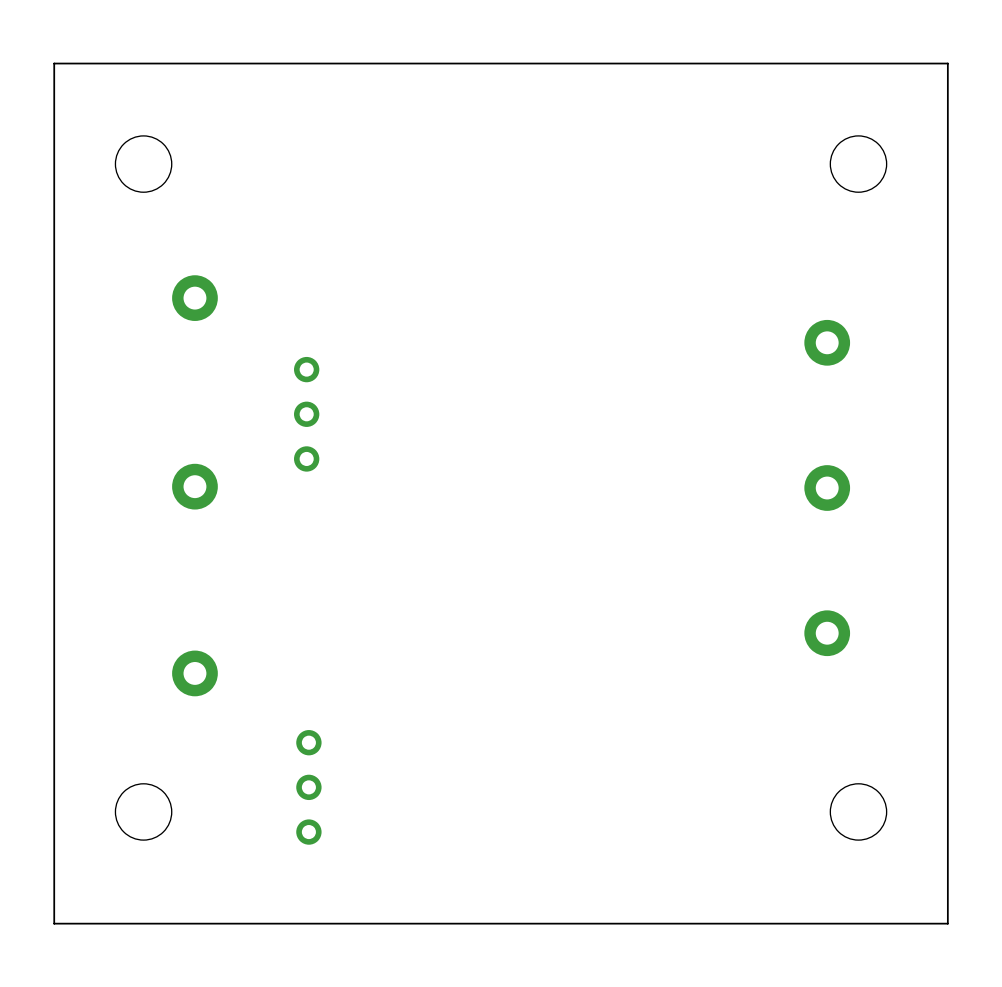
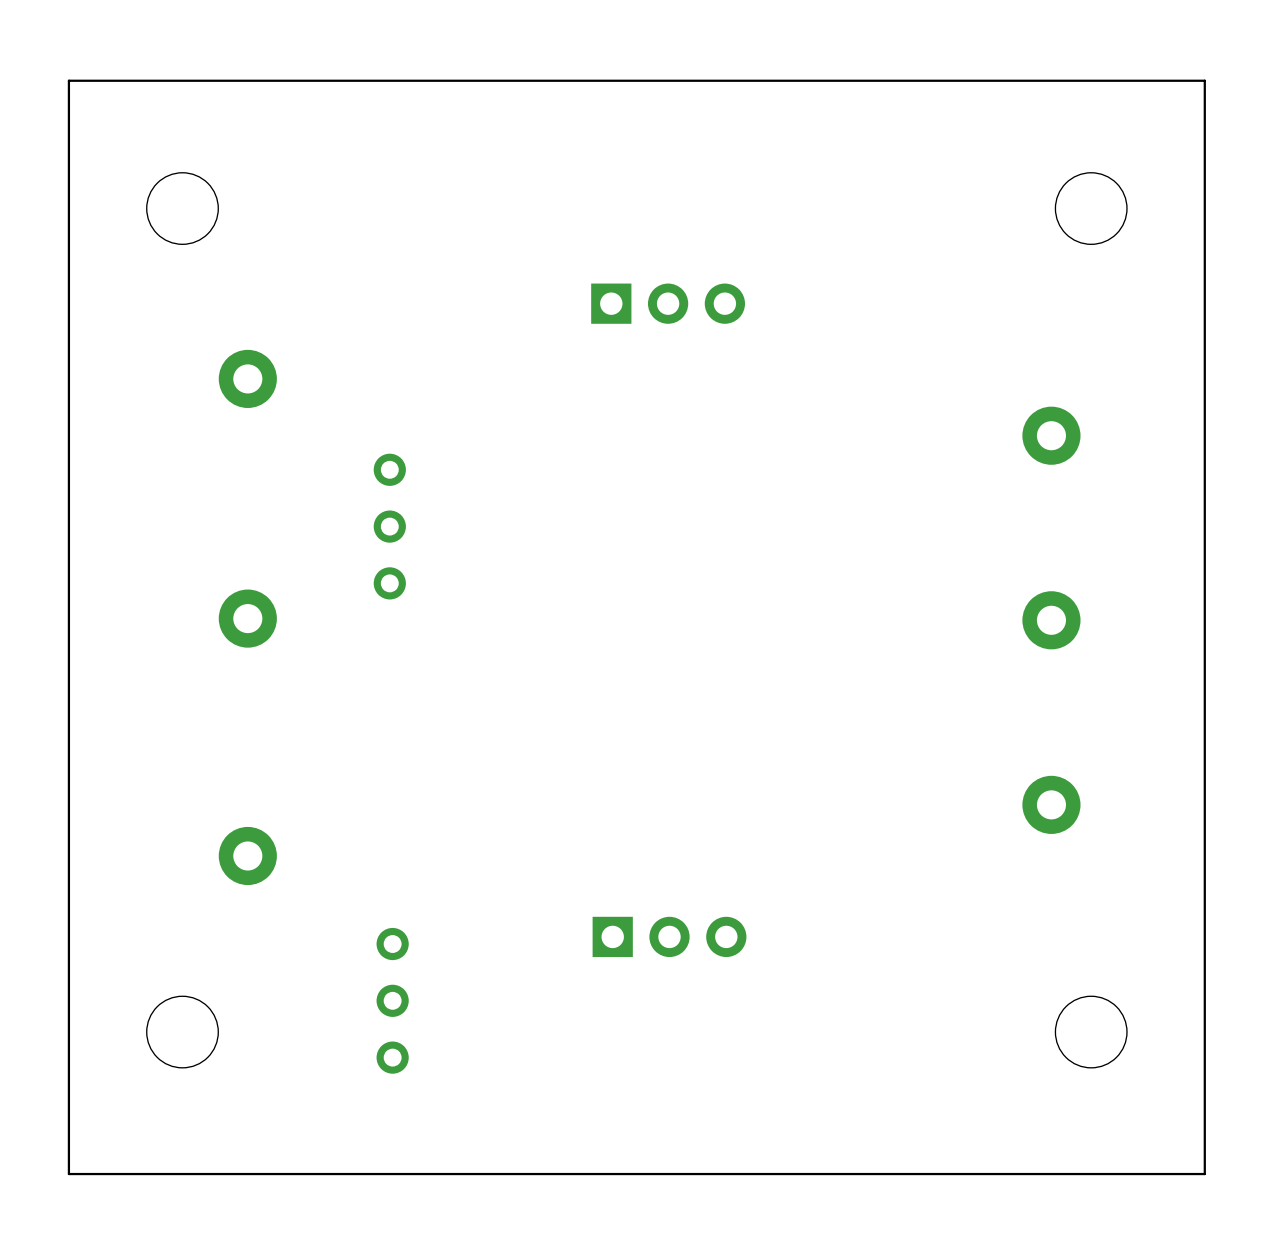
part: none -> (668, 303)
part: none -> (669, 936)

